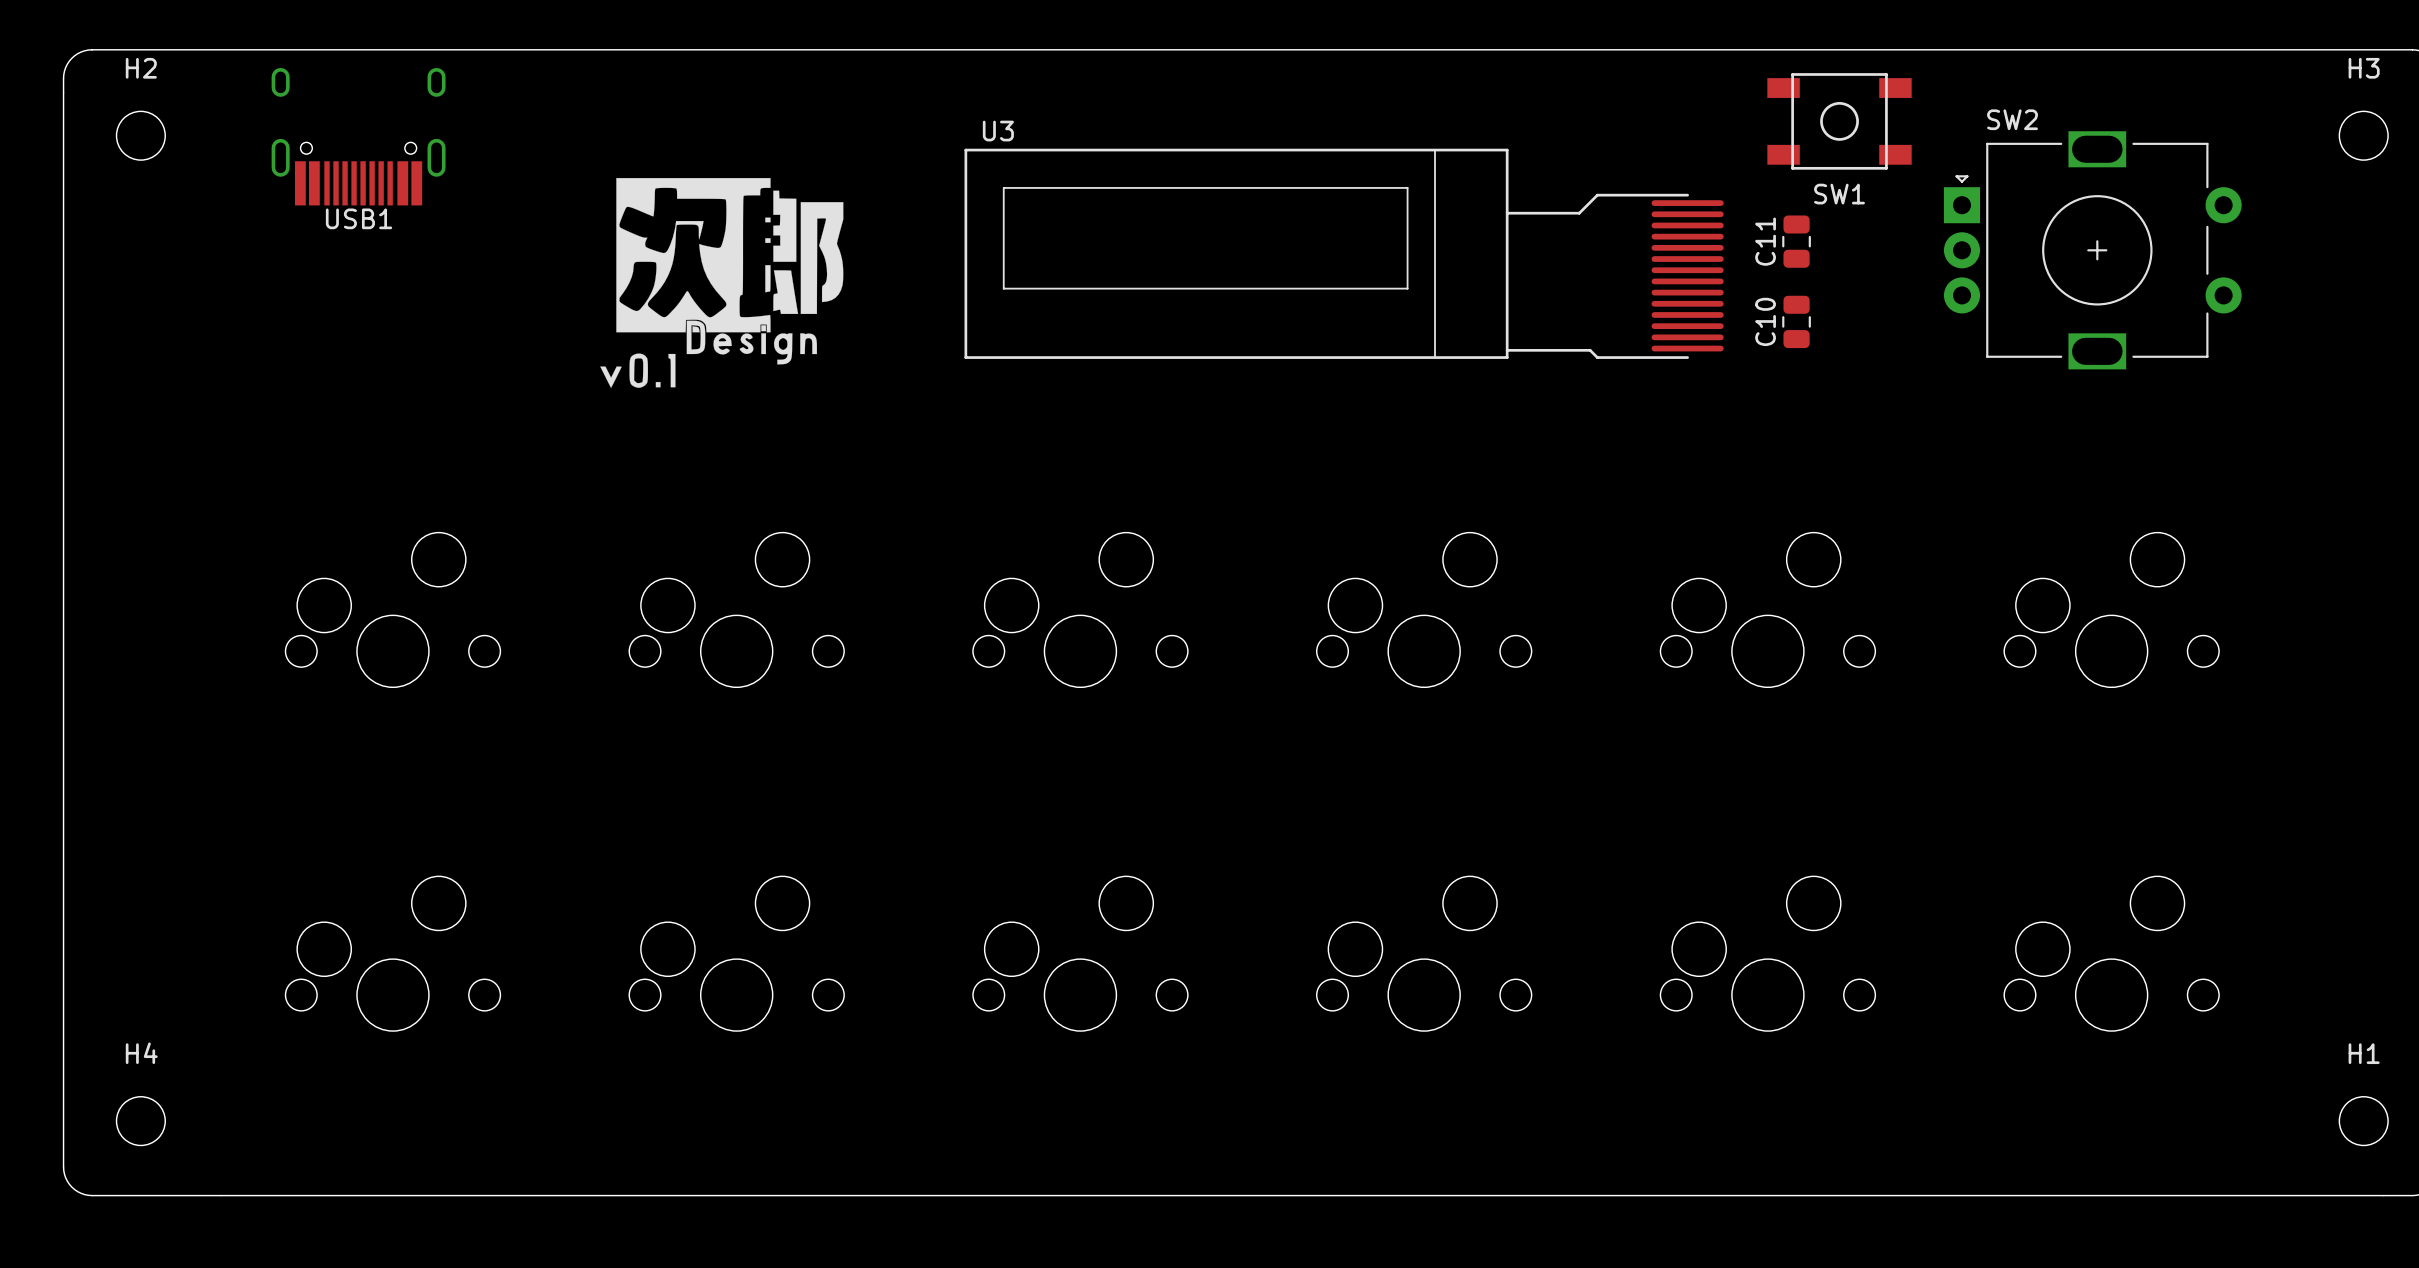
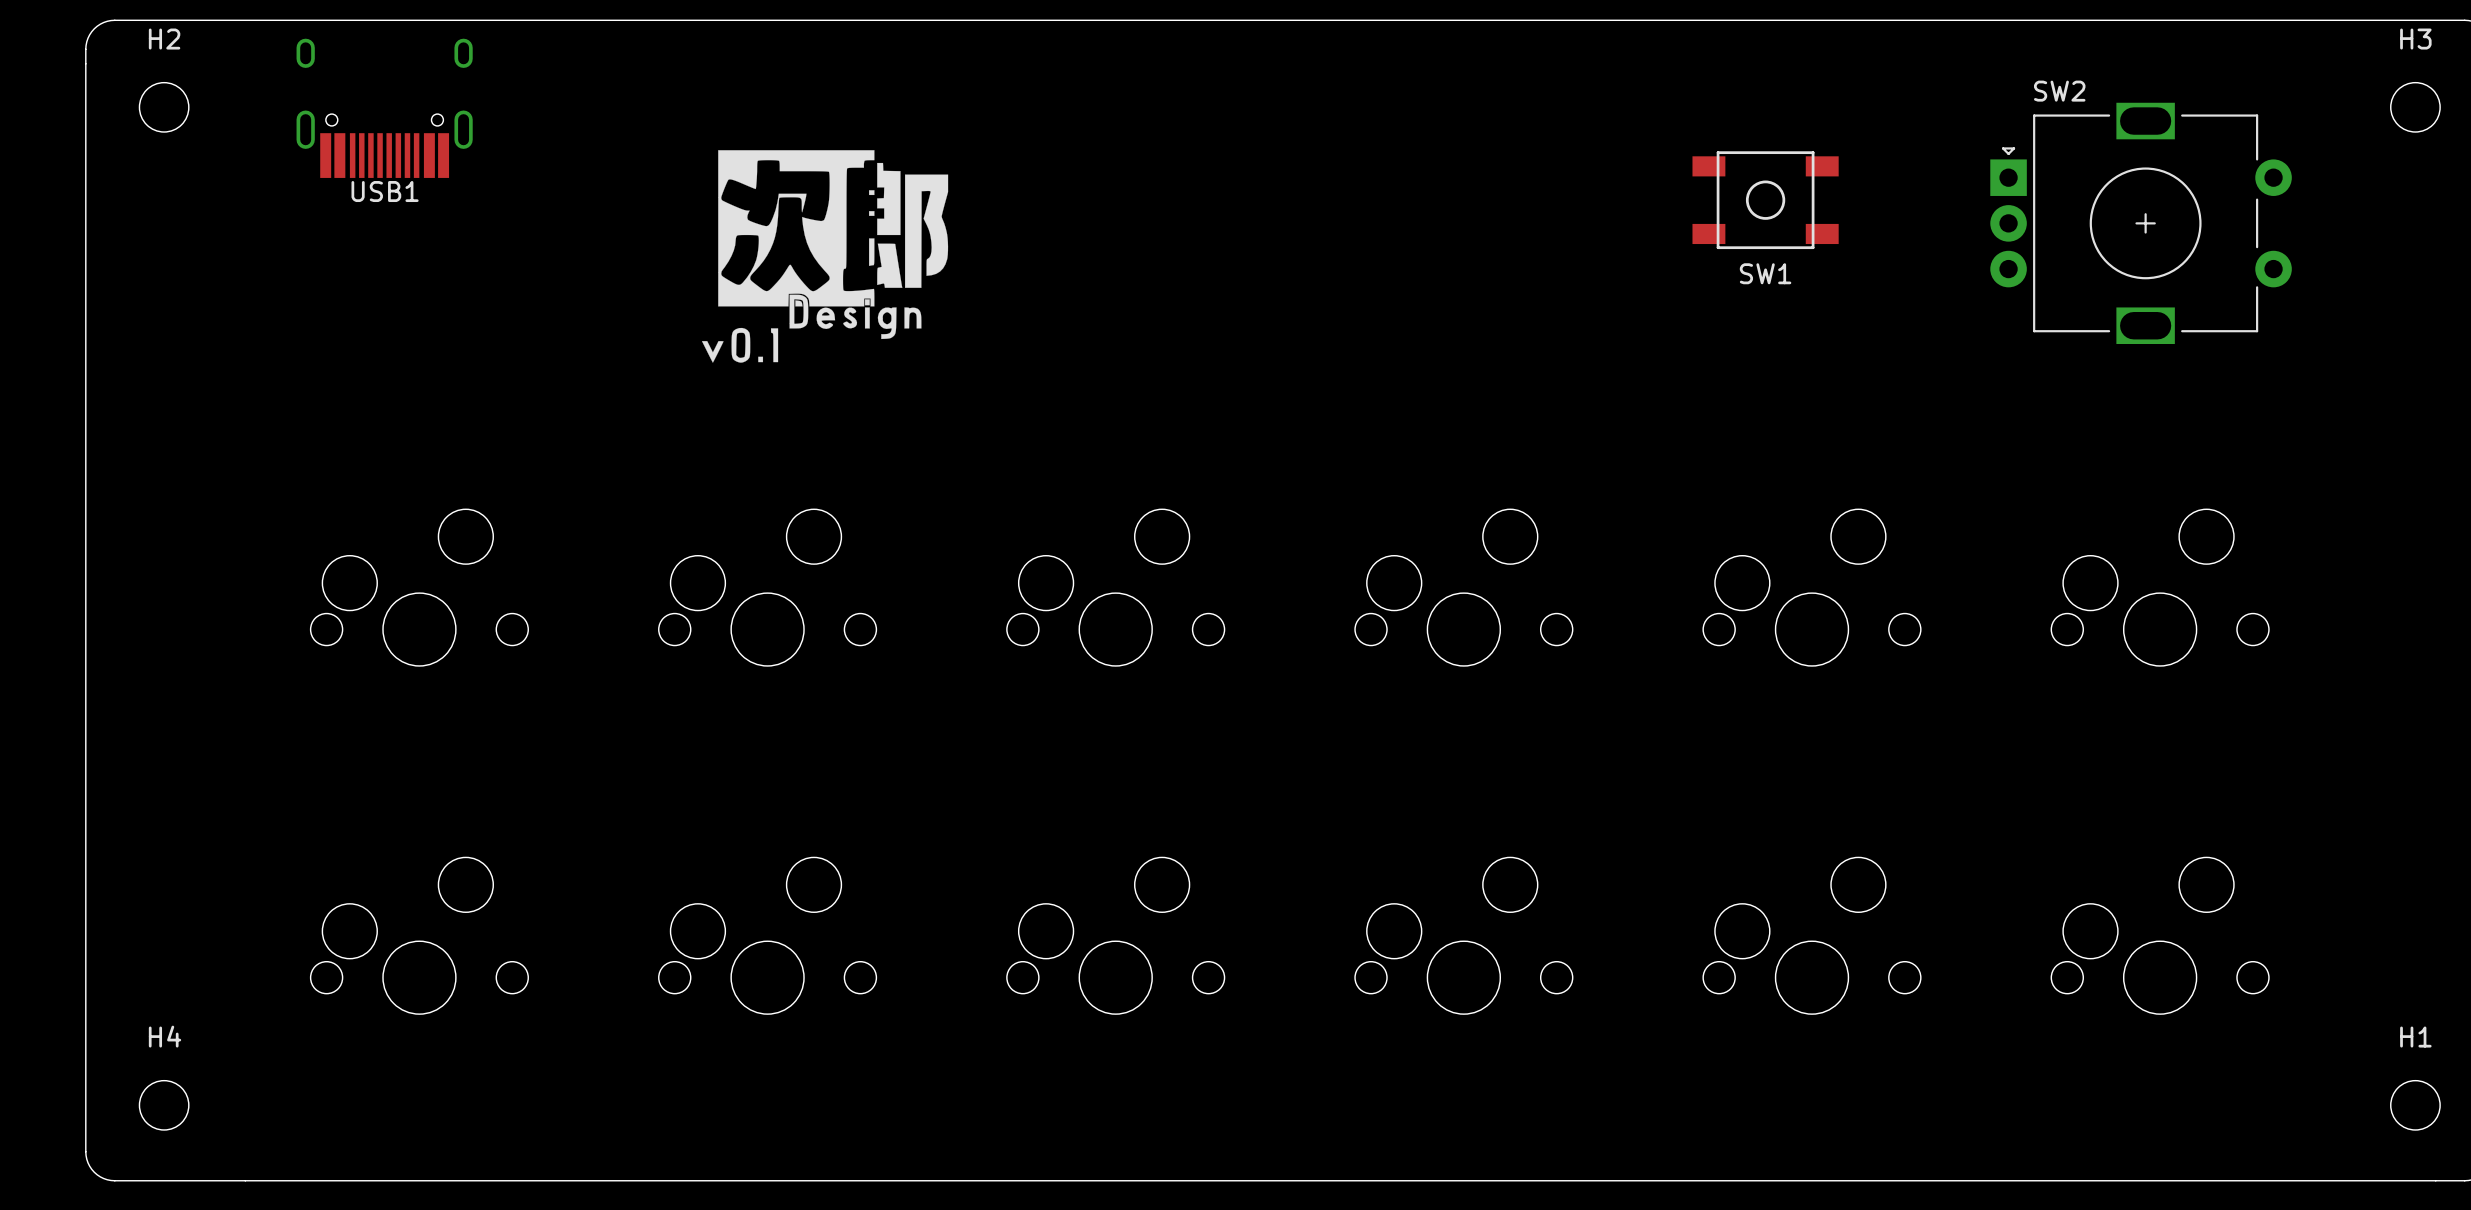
SW1 position: (1839, 121) -> (1765, 200)
C11: (1796, 241) -> none
U3: (1344, 253) -> none
drawing position: (721, 282) -> (825, 256)
C10: (1796, 321) -> none

